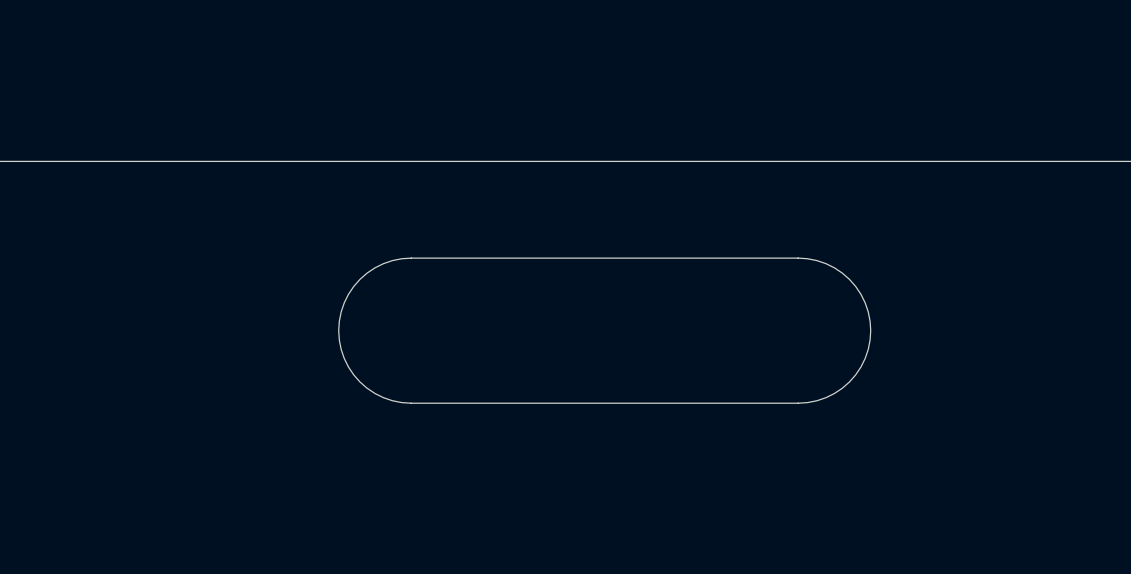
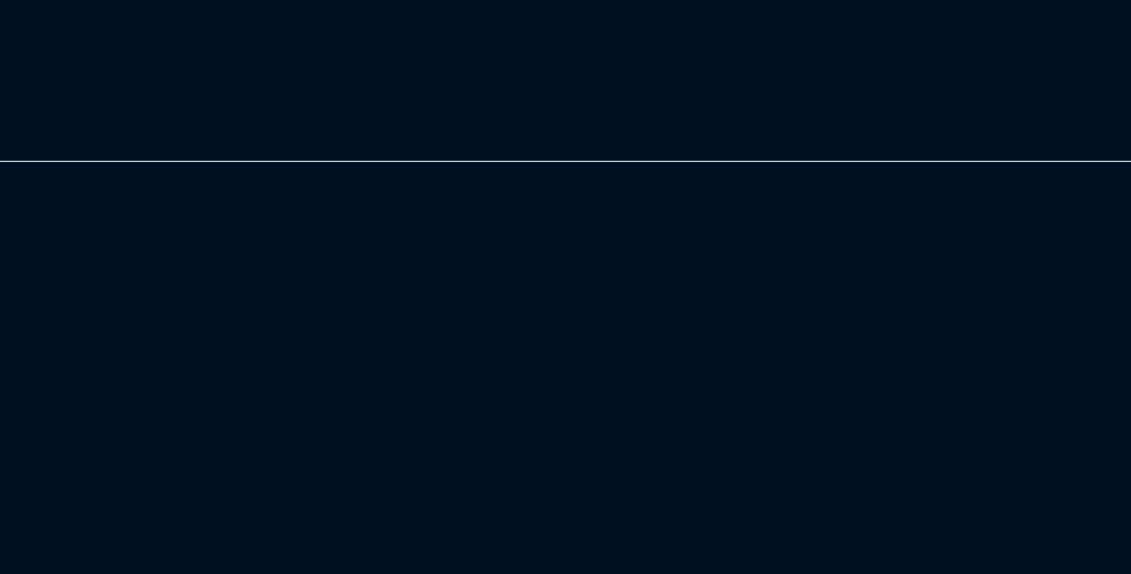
board edge: (798, 258) (401, 258) (374, 267) (353, 286) (341, 311) (339, 340) (348, 366) (359, 381) (383, 397) (401, 402) (807, 402) (825, 397) (849, 381) (865, 358) (870, 330) (865, 302) (849, 279) (825, 263) (798, 258) -> none

